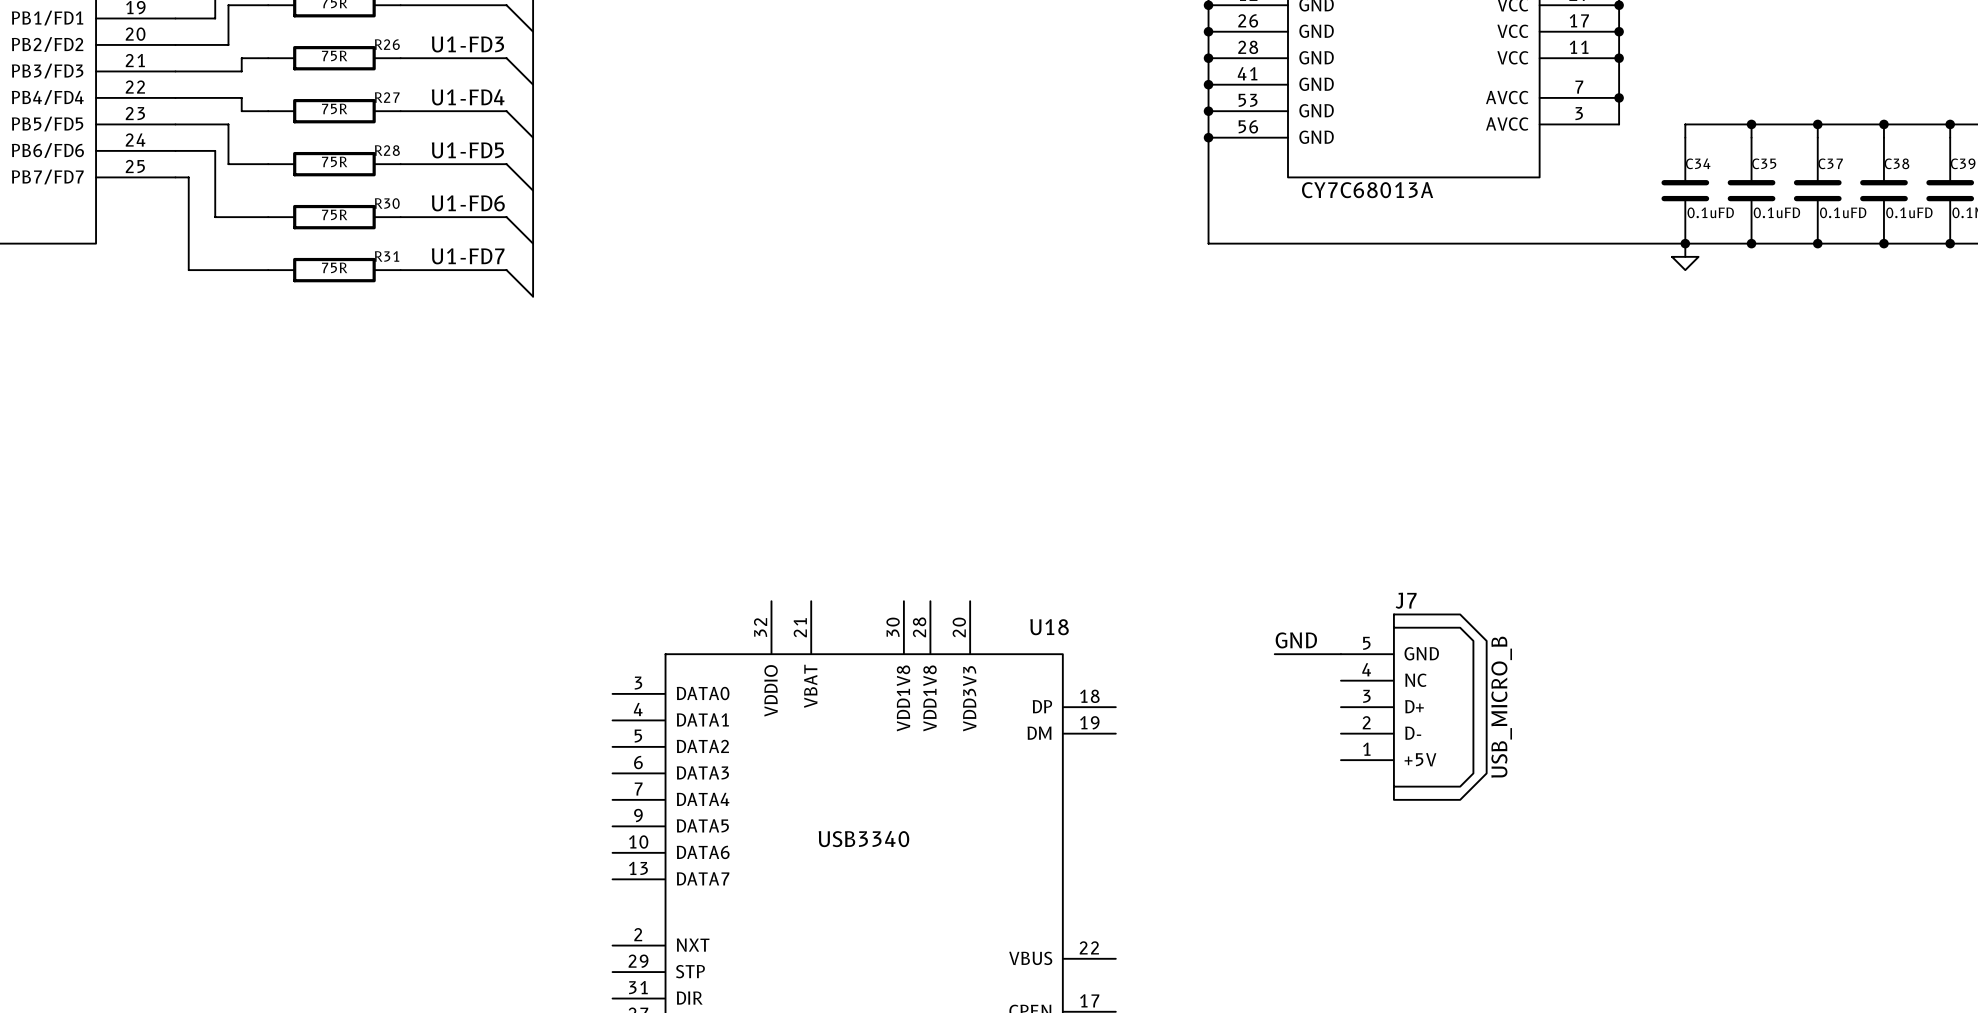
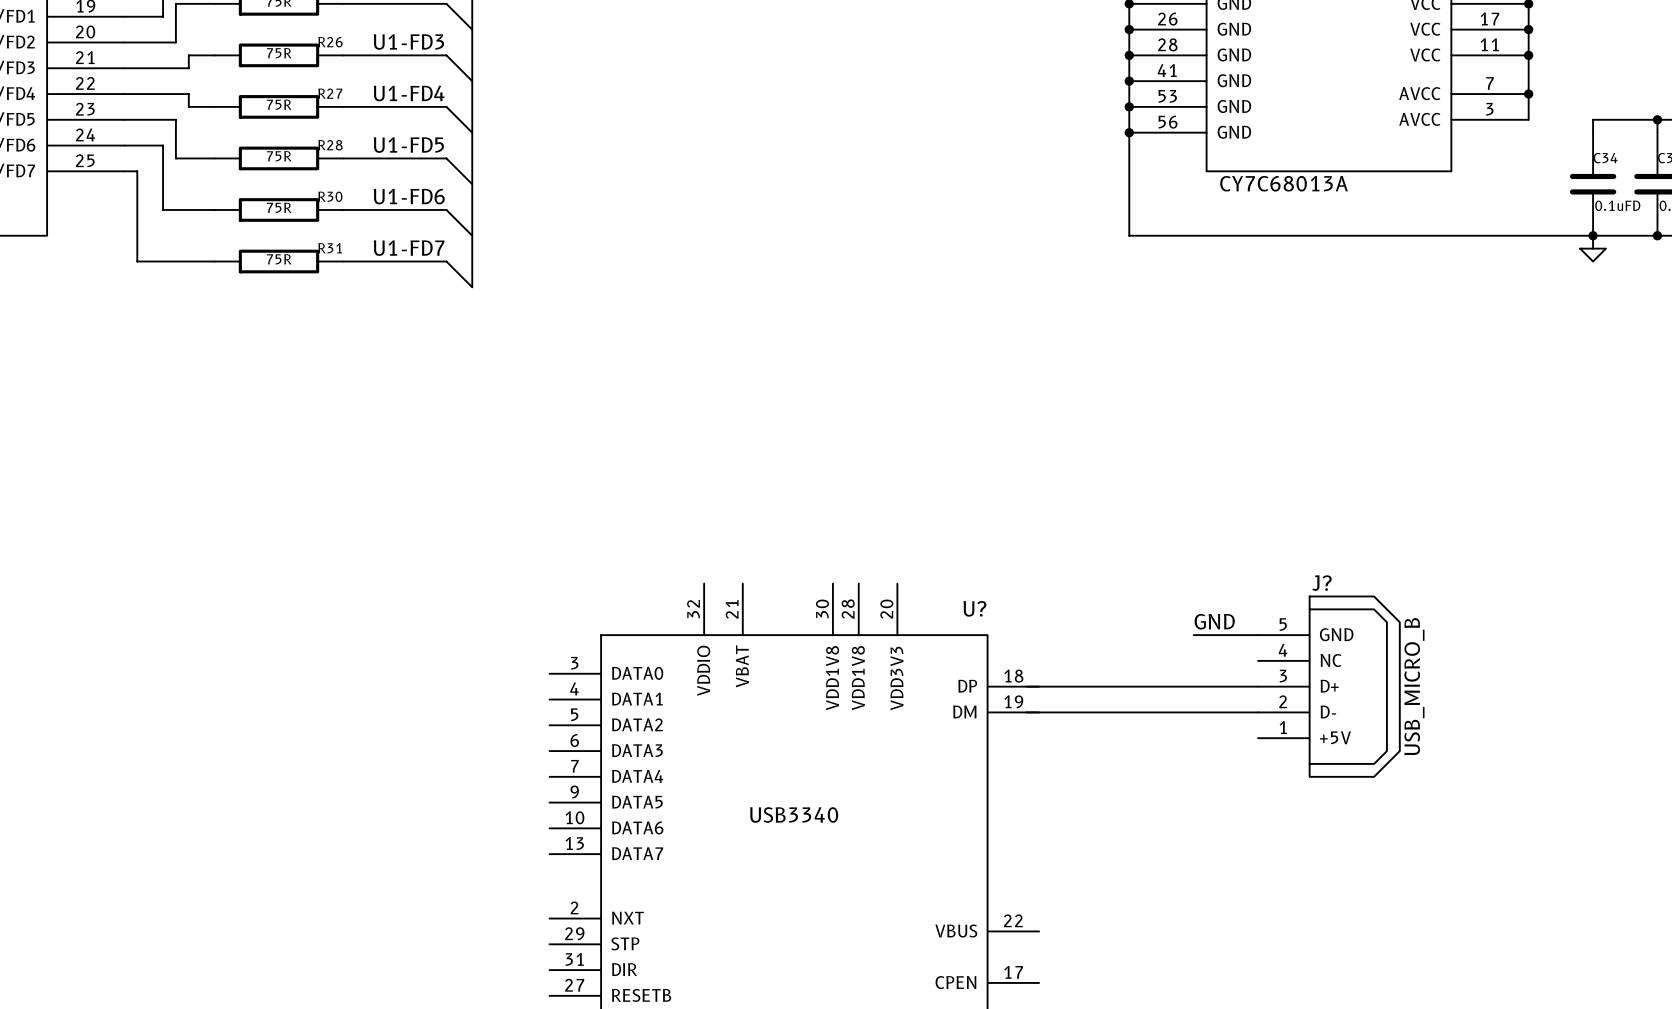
J7 name: J7 (1406, 600) -> J? (1322, 583)
U18 name: U18 (1049, 627) -> U? (974, 608)
wire: none -> (1026, 686) (1258, 686)
wire: none -> (1026, 712) (1258, 712)

